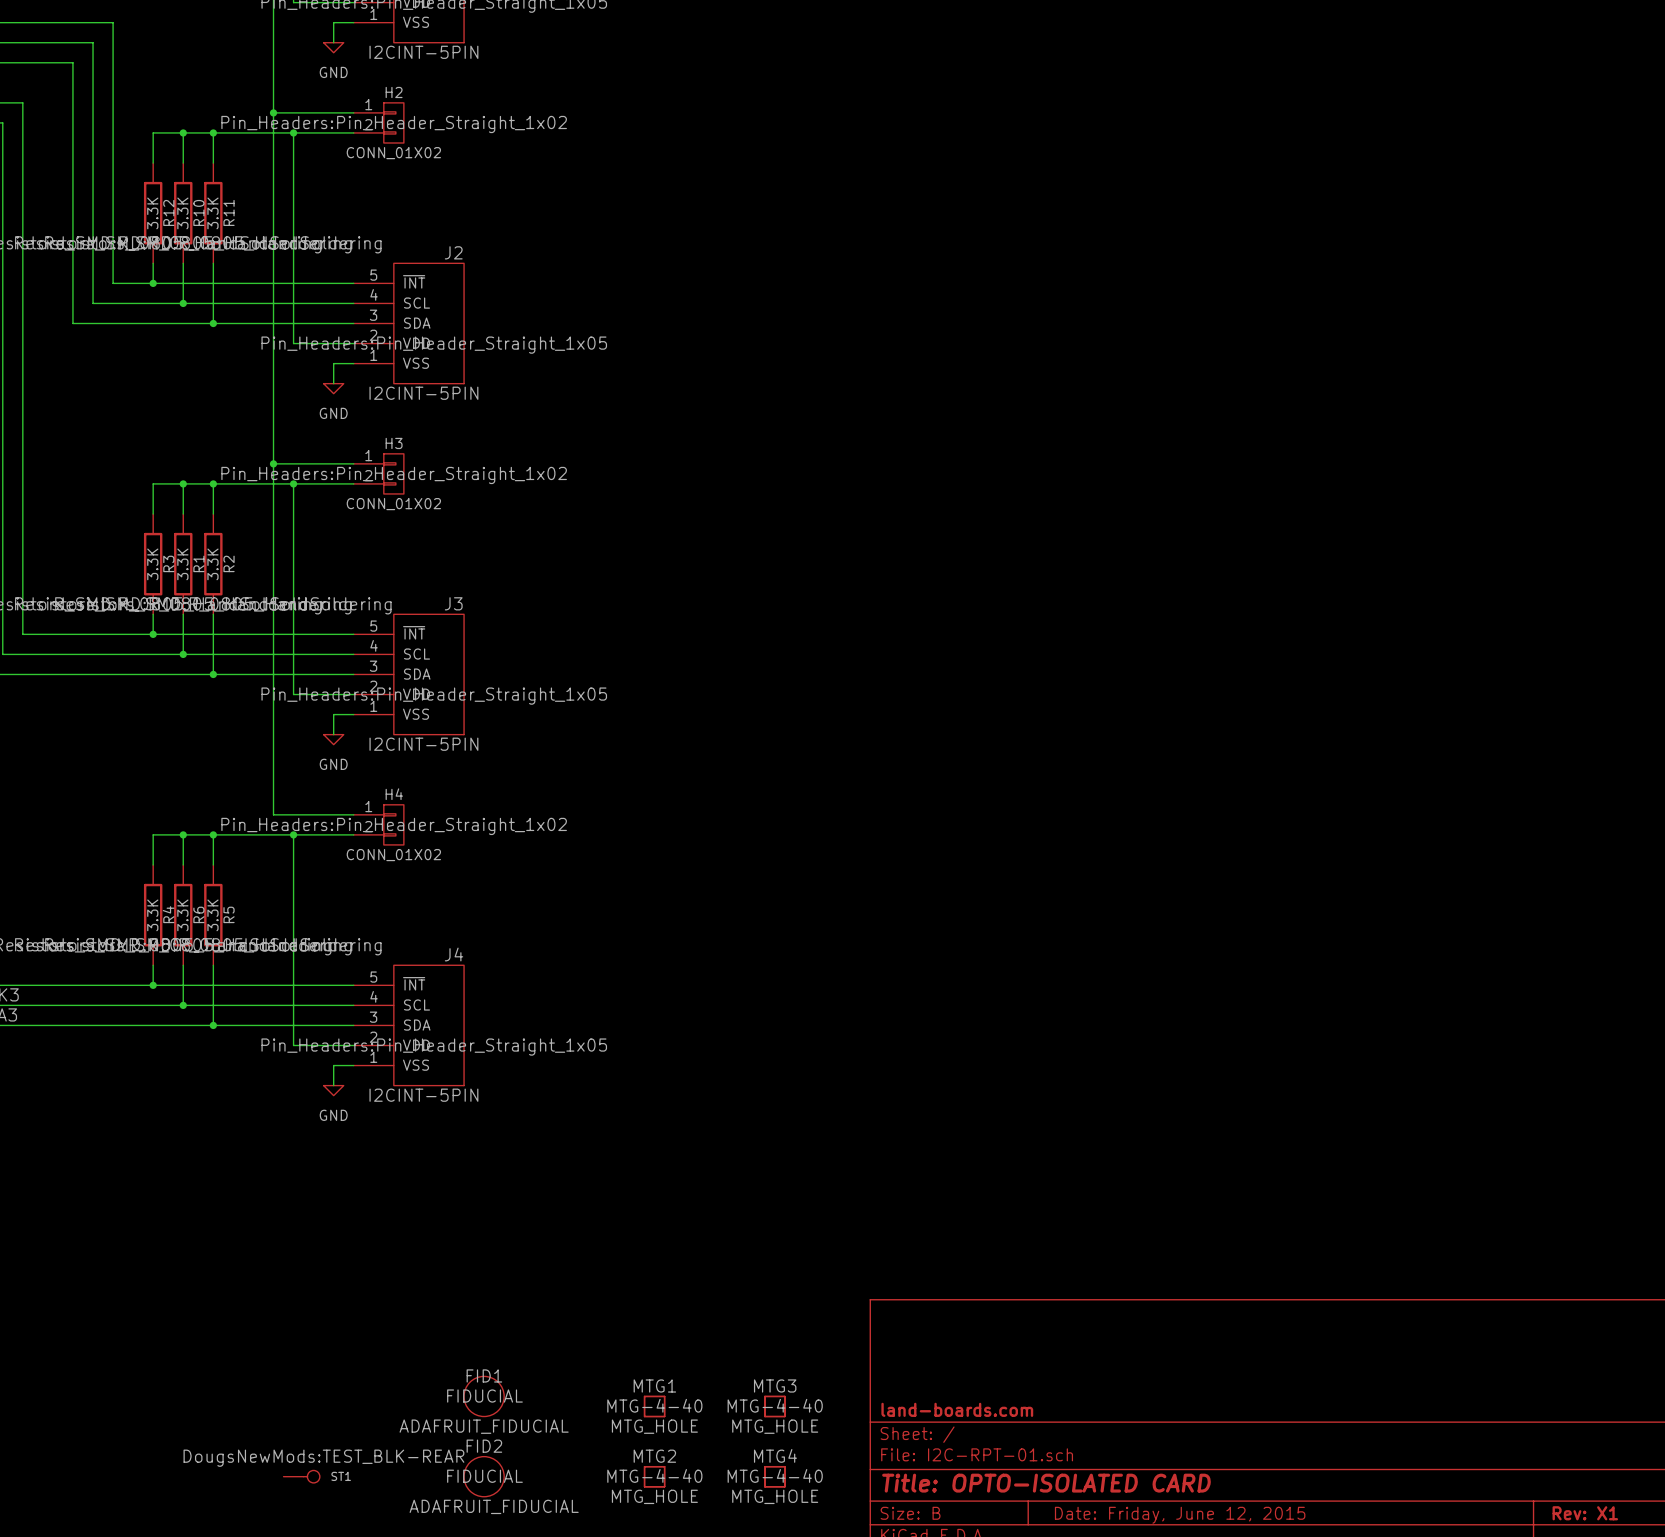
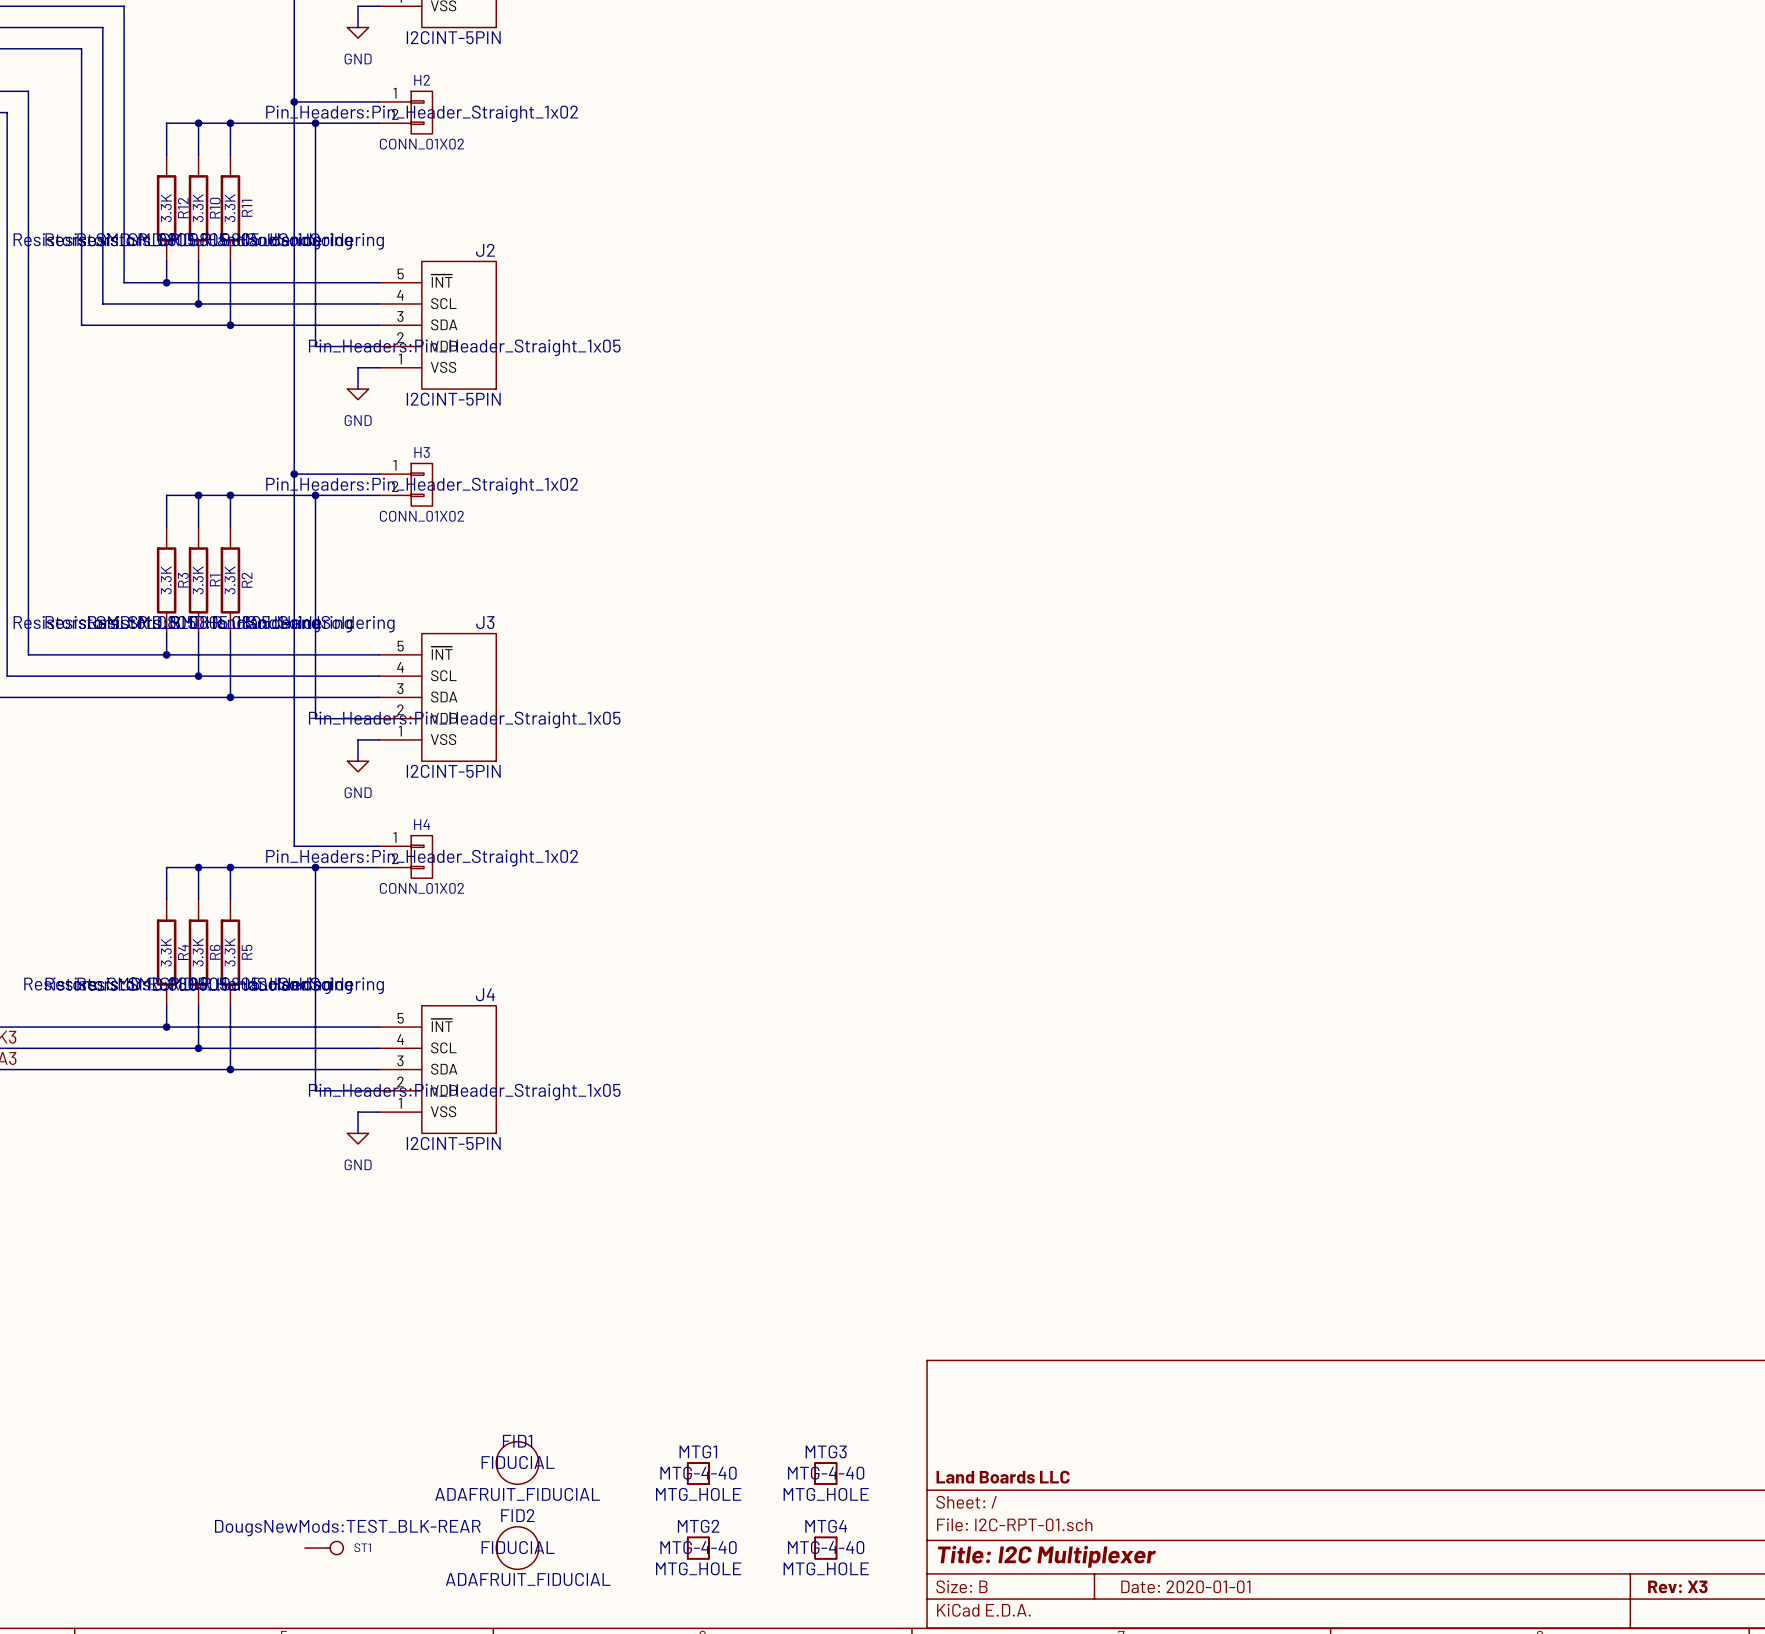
title block: land-boards.com (957, 1409) -> Land Boards LLC (1003, 1477)
title block: Title: OPTO-ISOLATED CARD (1046, 1483) -> Title: I2C Multiplexer (1046, 1556)
title block: Rev: X1 (1585, 1513) -> Rev: X3 (1677, 1586)
title block: Date: Friday, June 12, 2015 (1180, 1515) -> Date: 2020-01-01 (1185, 1586)

